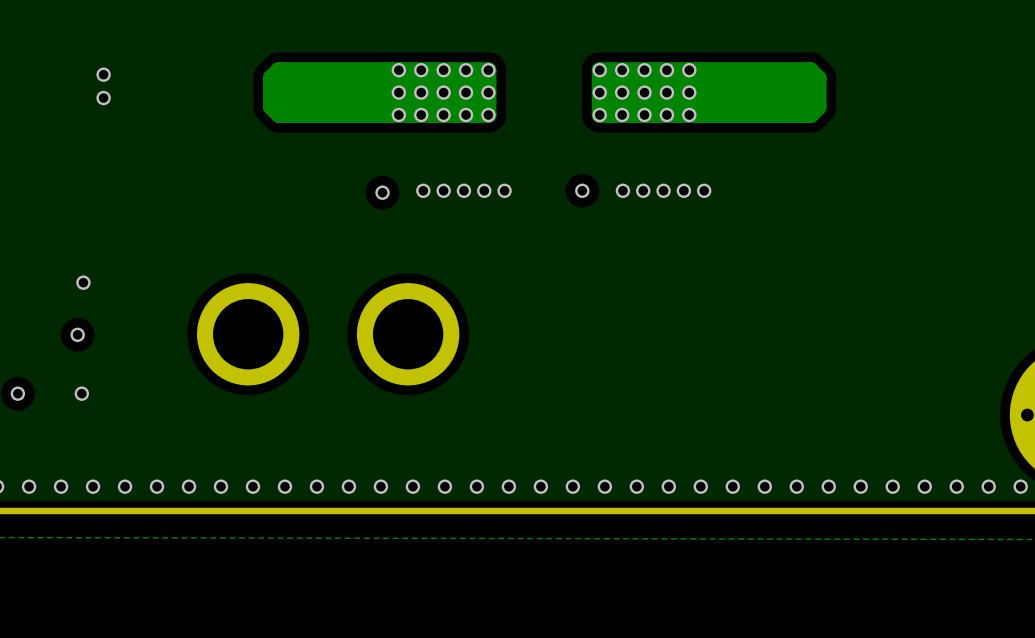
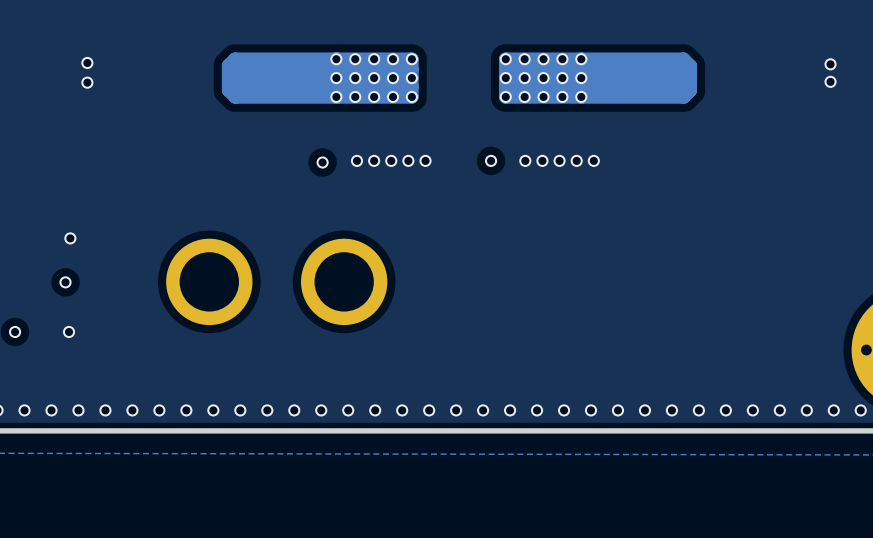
via: none -> (830, 64)
via: none -> (830, 81)

